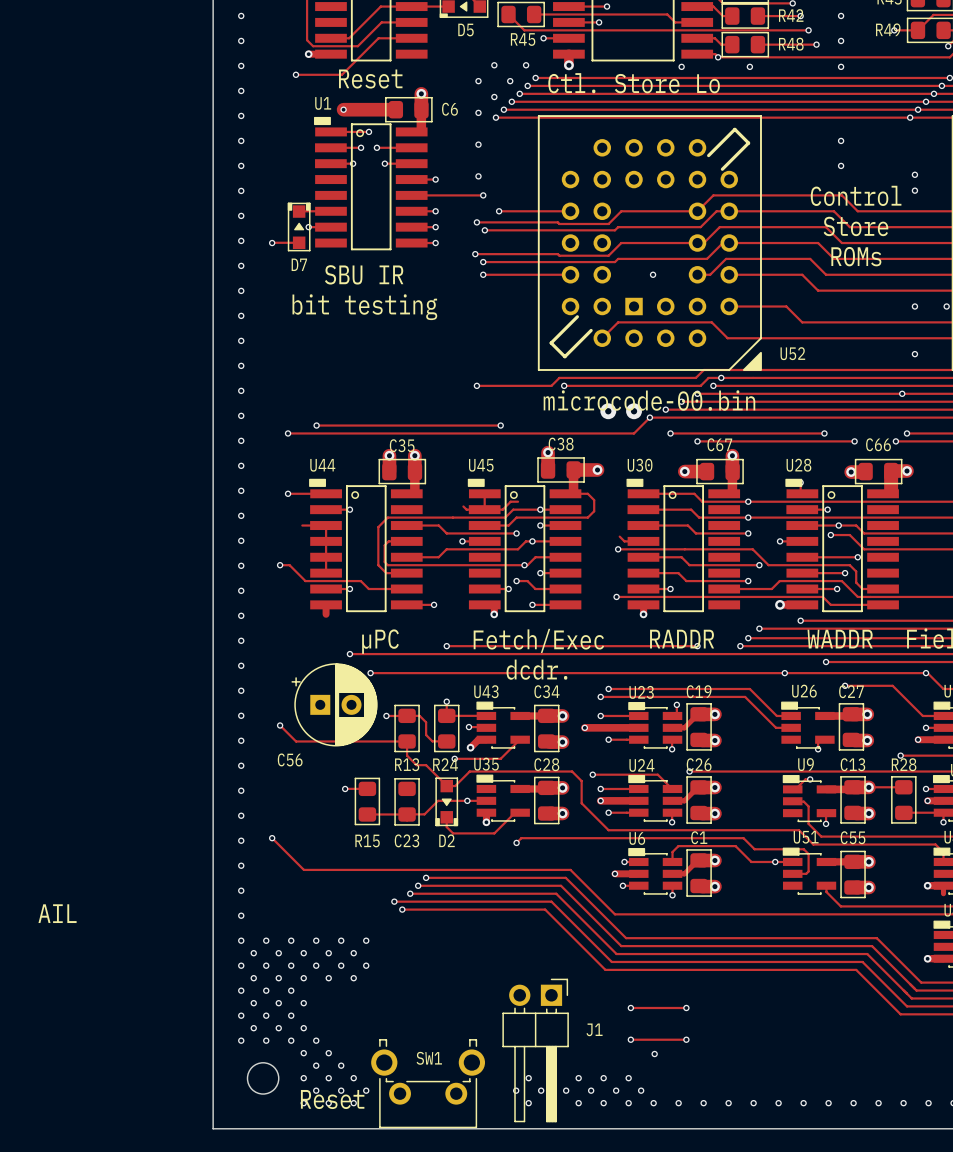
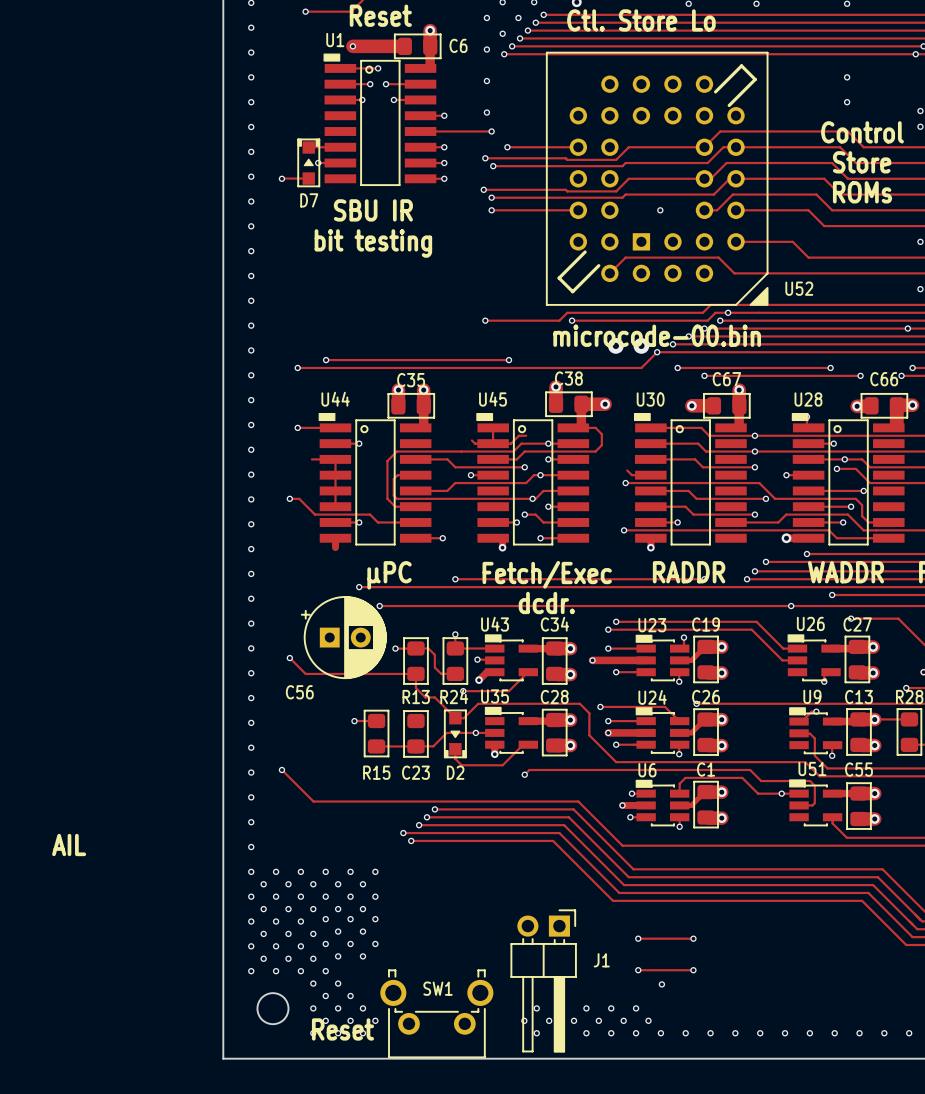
via: none -> (325, 919)
via: none -> (350, 919)
via: none -> (375, 919)
via: none -> (338, 931)
via: none -> (362, 931)
via: none -> (325, 943)
via: none -> (350, 943)
via: none -> (375, 943)
via: none -> (338, 956)
via: none -> (362, 956)

